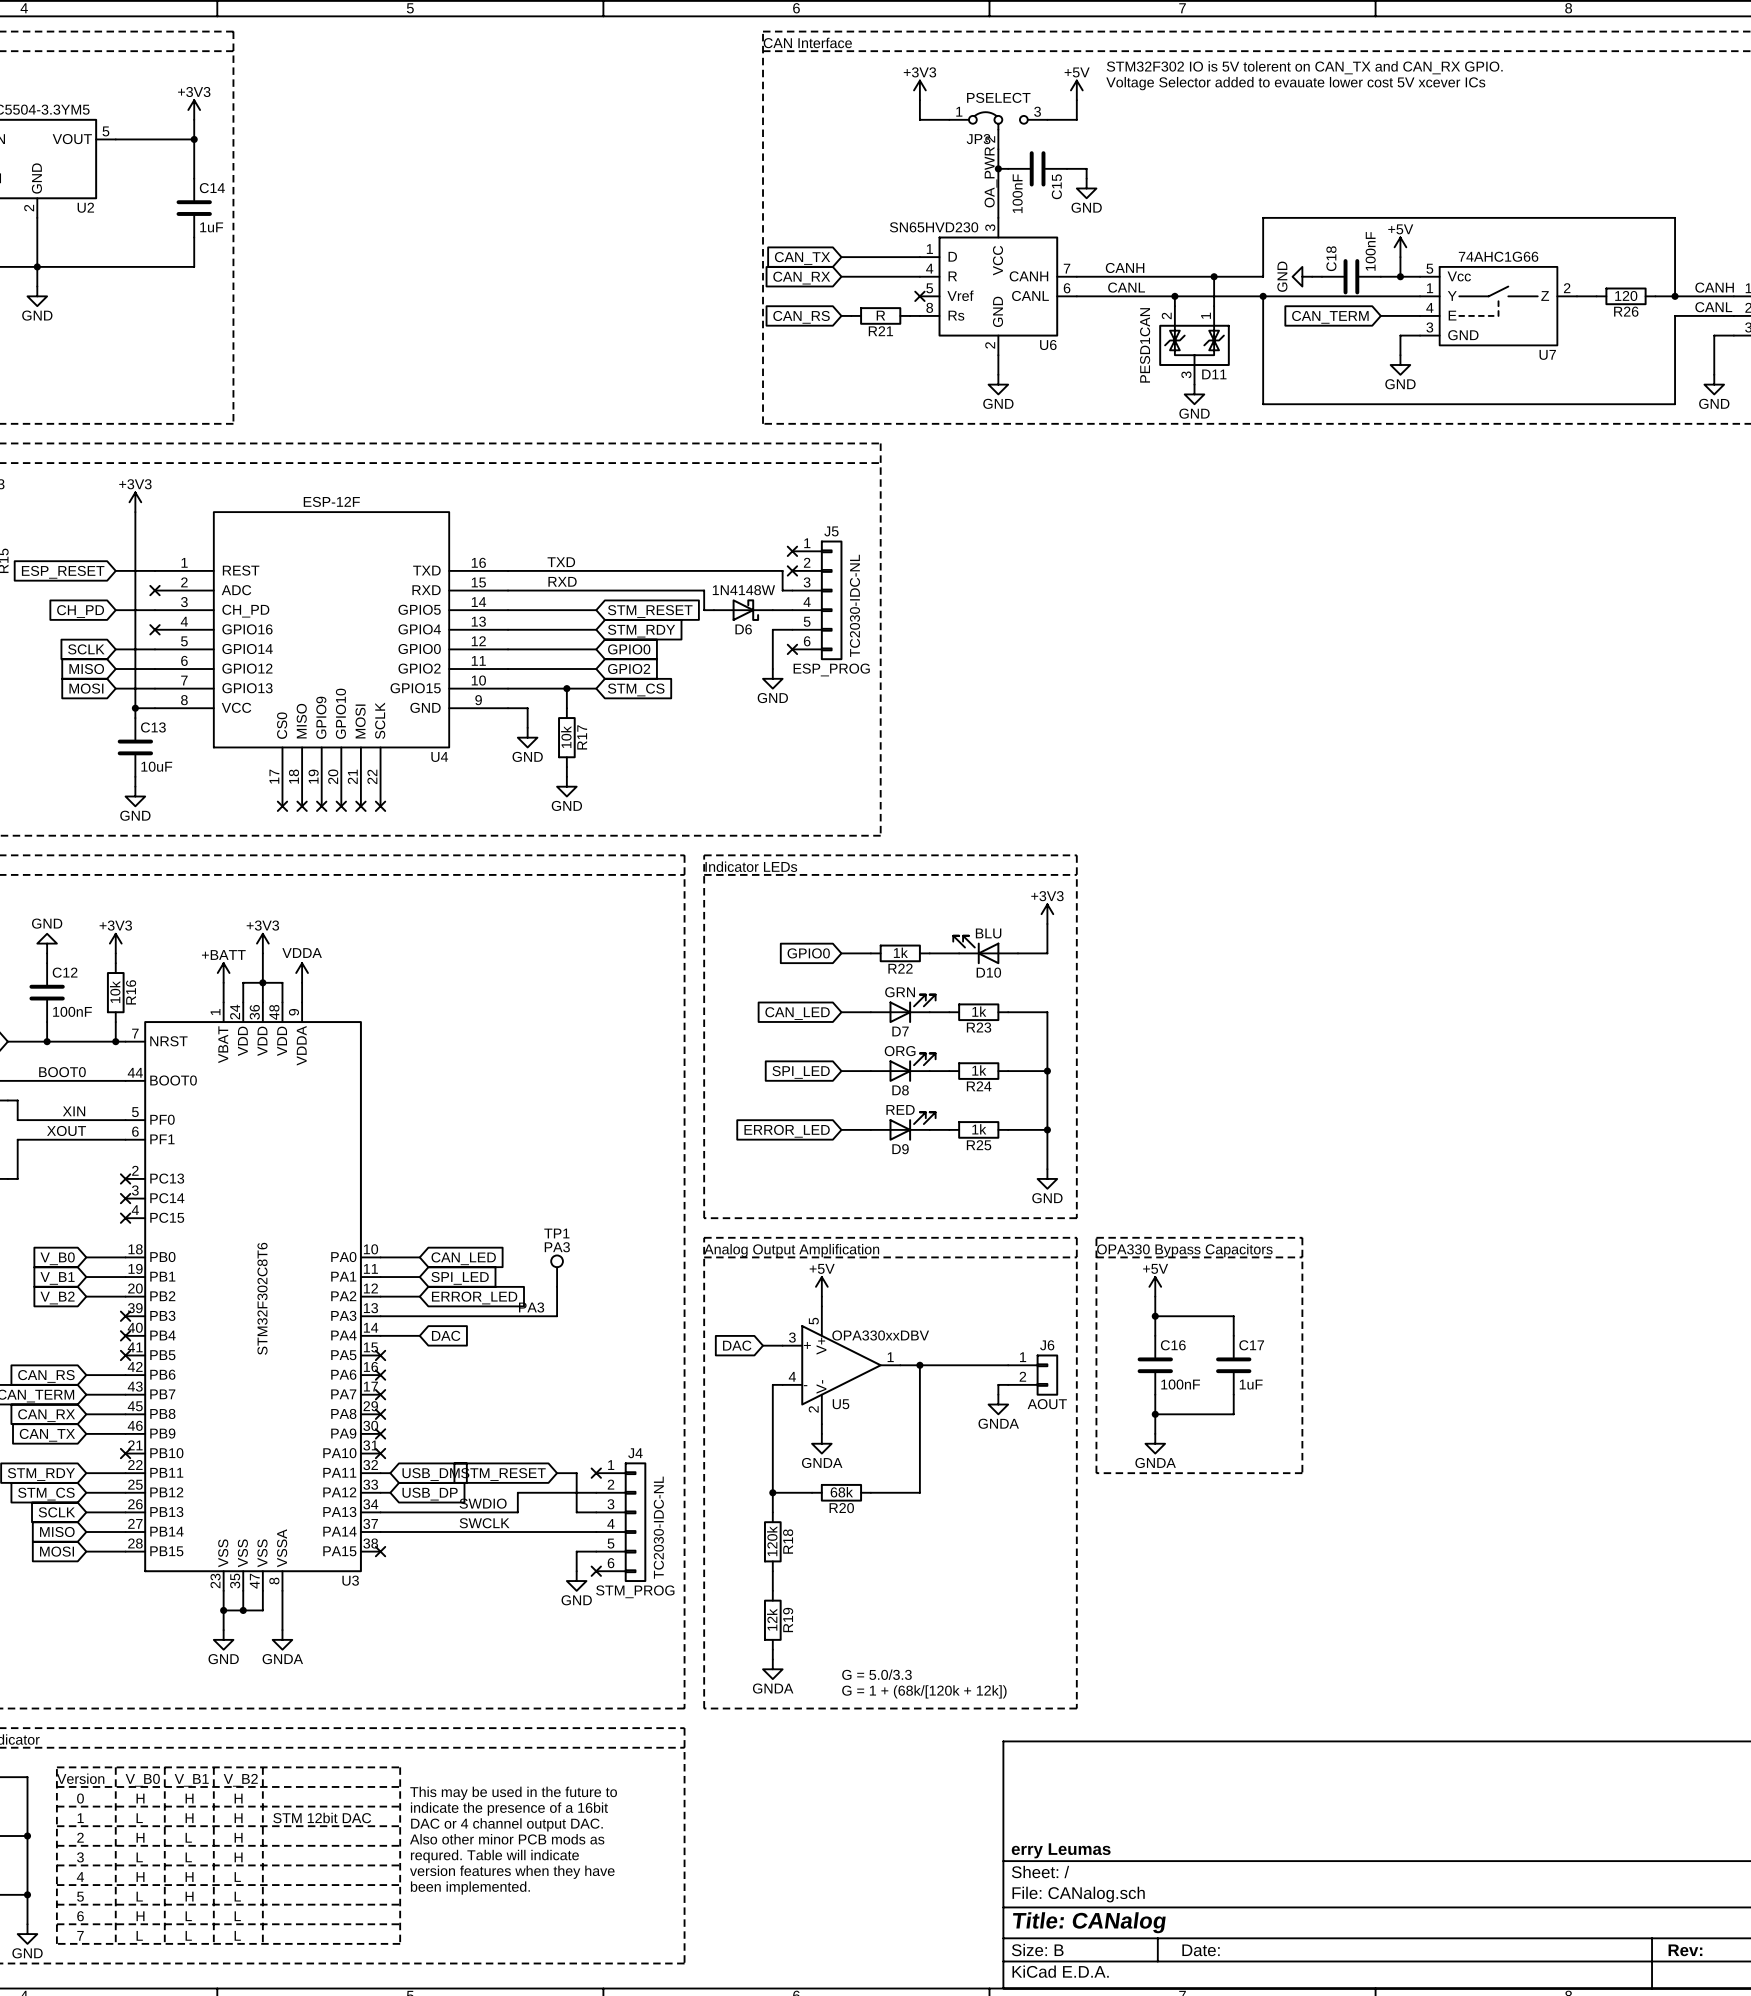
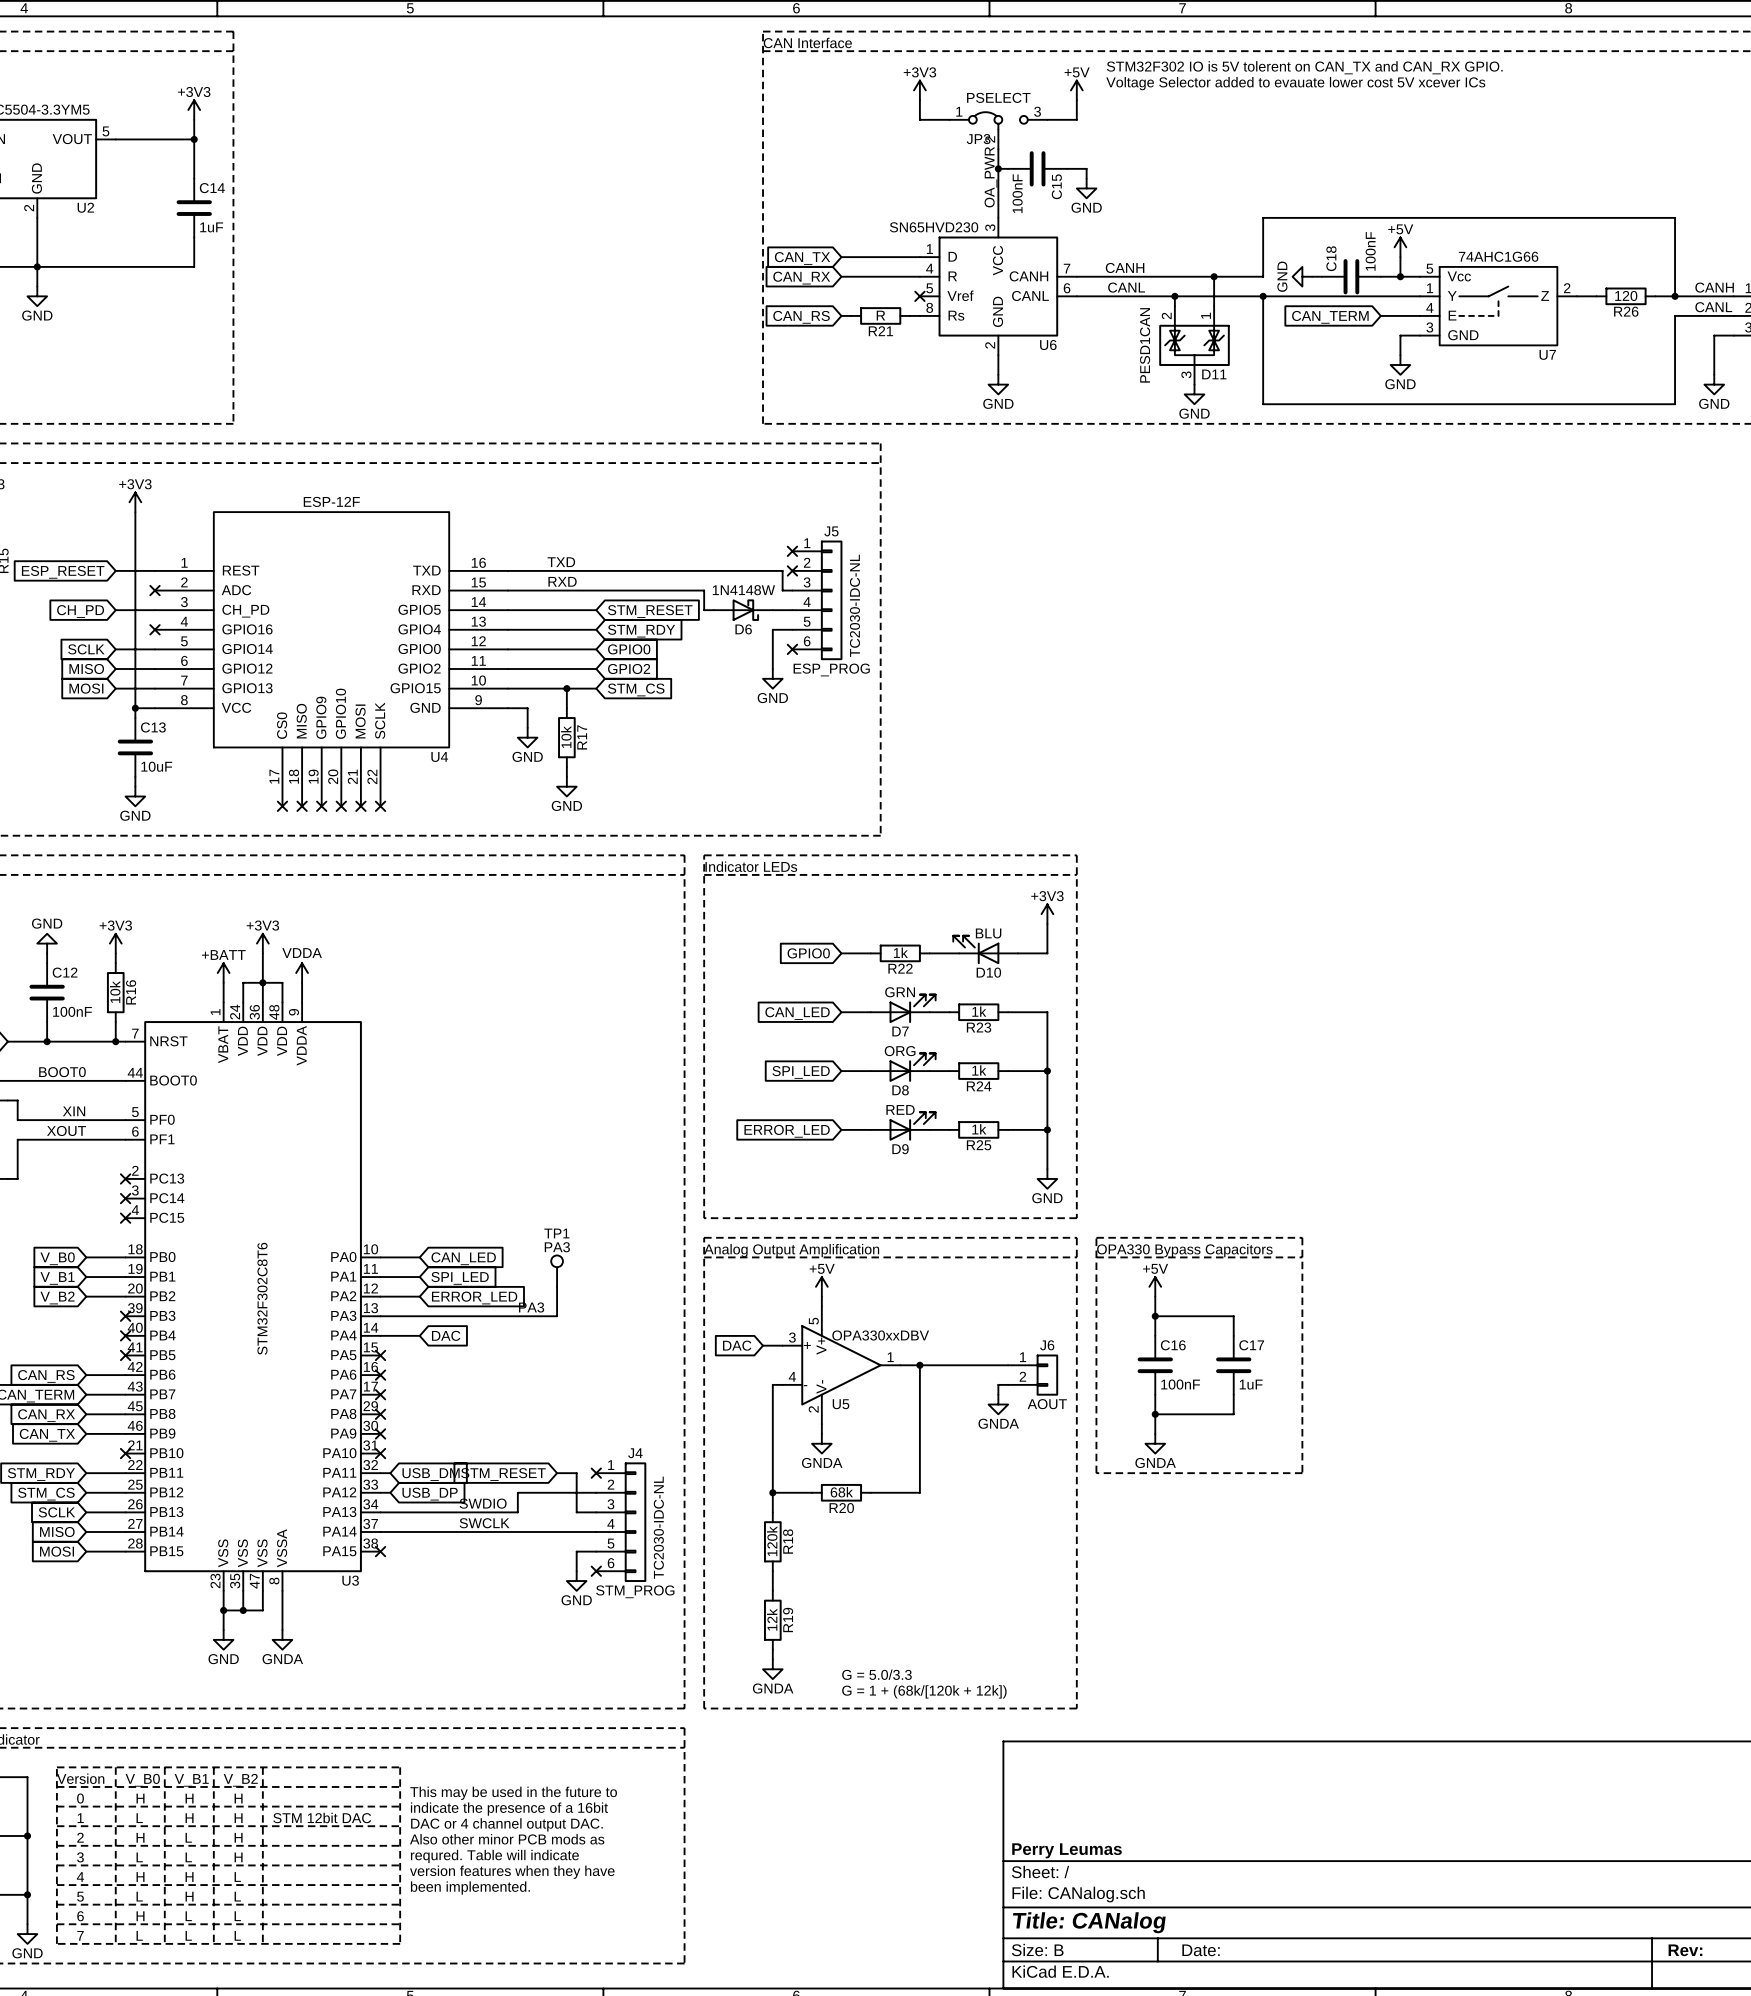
title block: erry Leumas (1061, 1850) -> Perry Leumas (1067, 1850)

